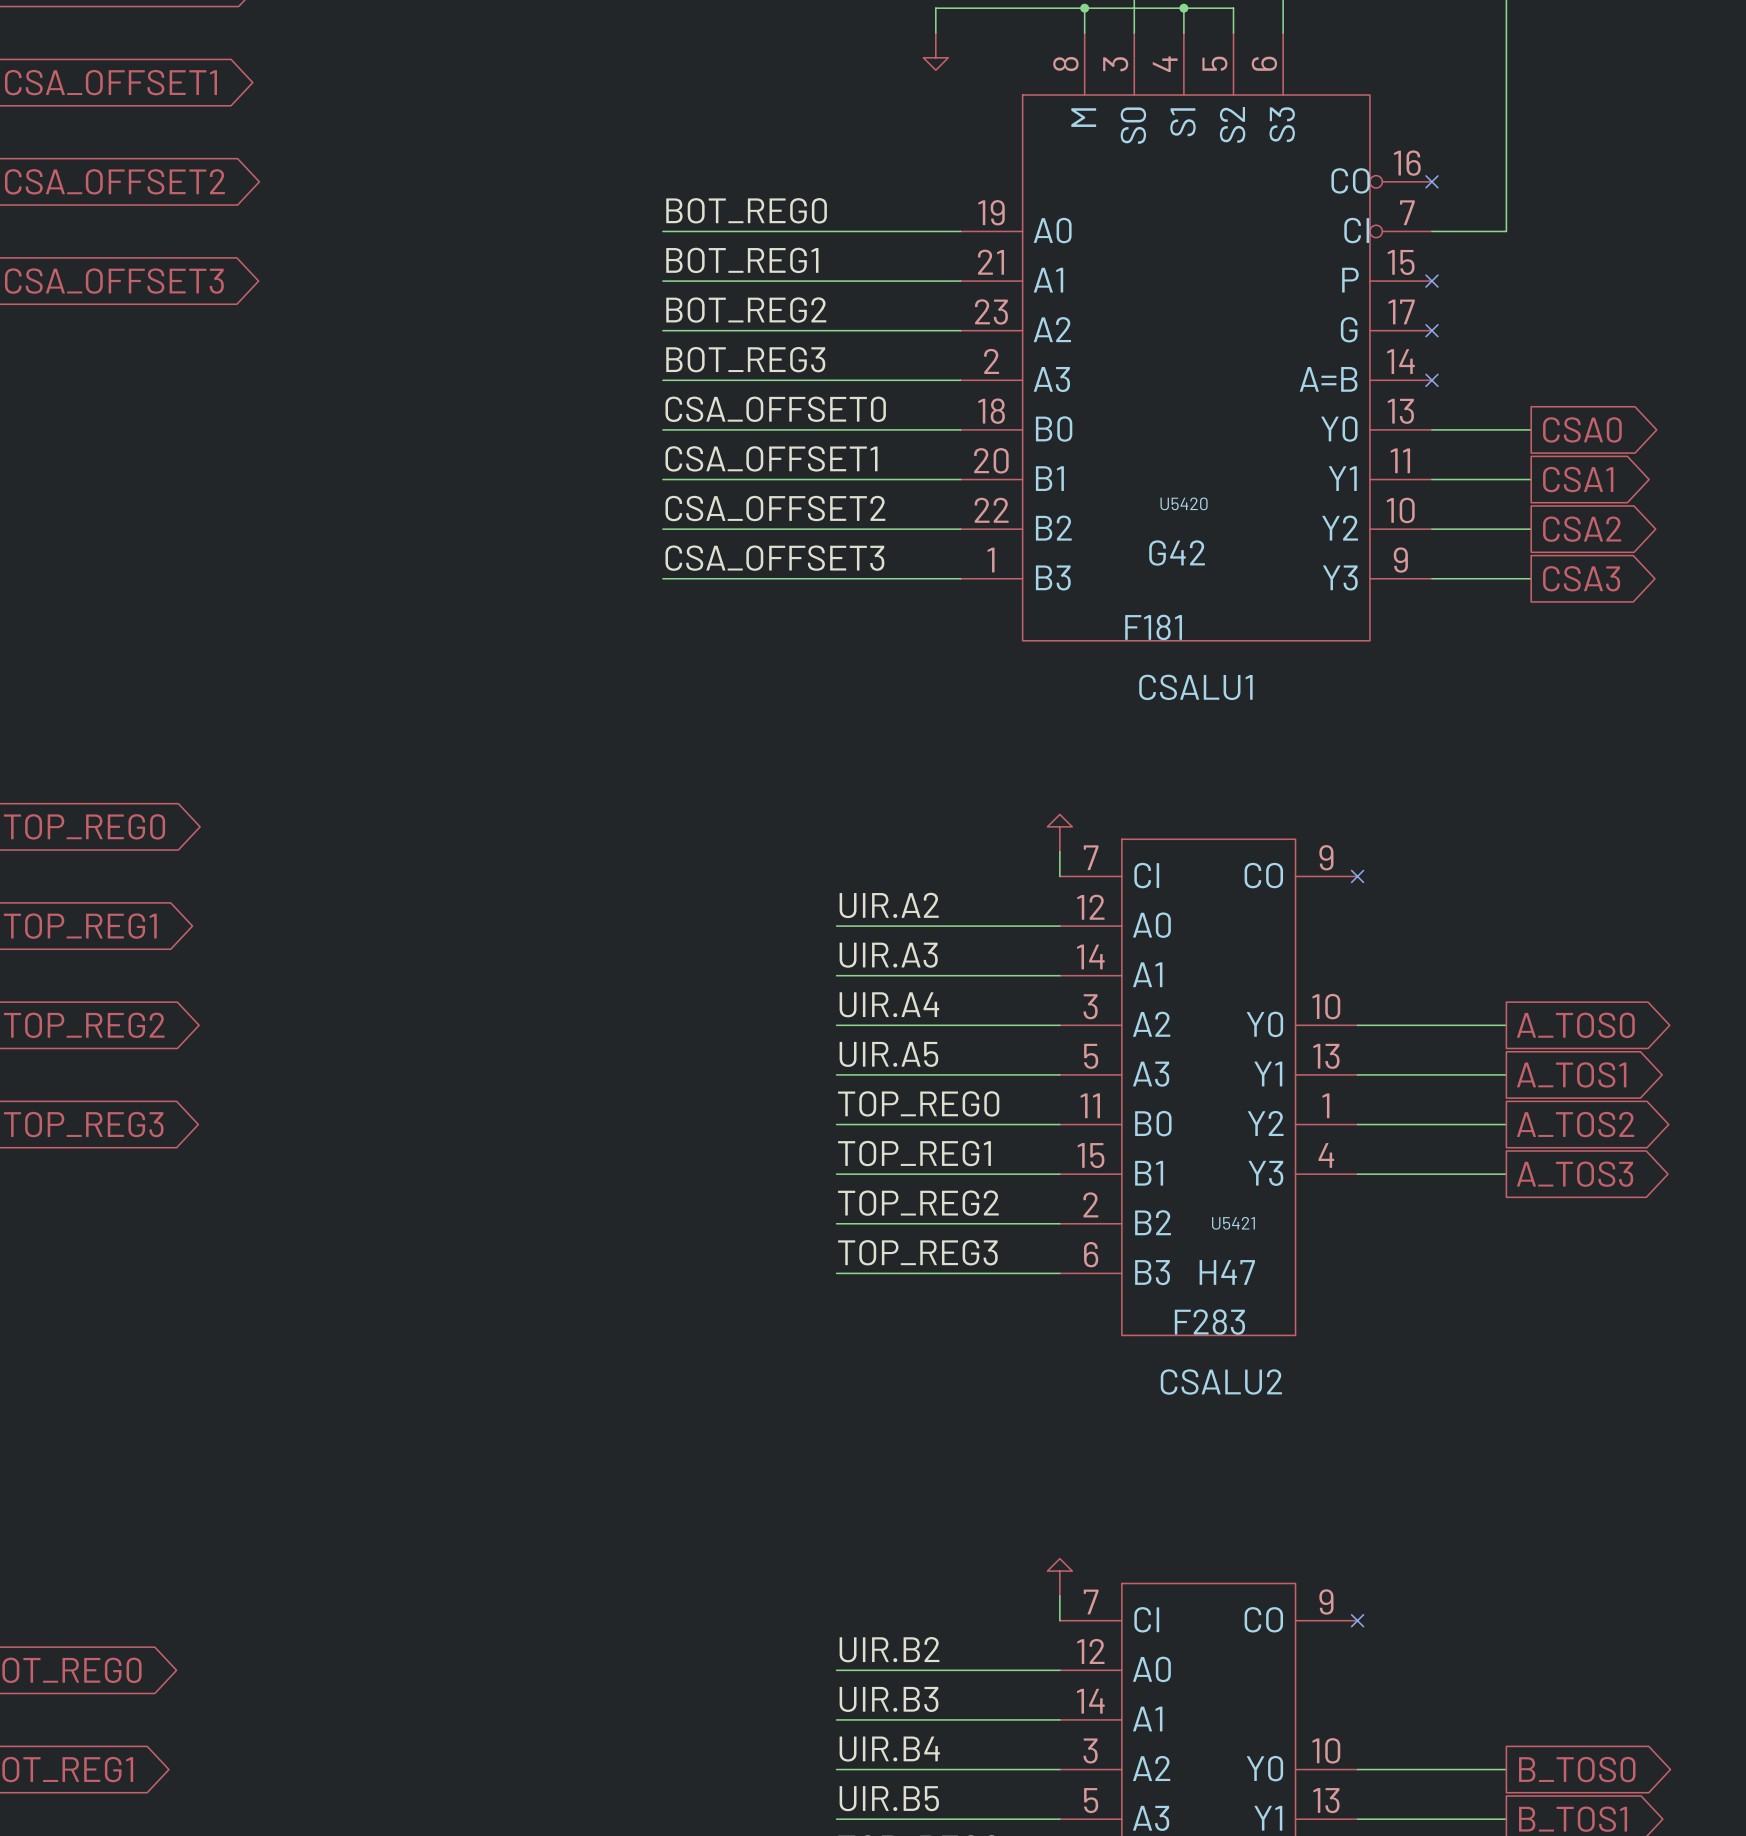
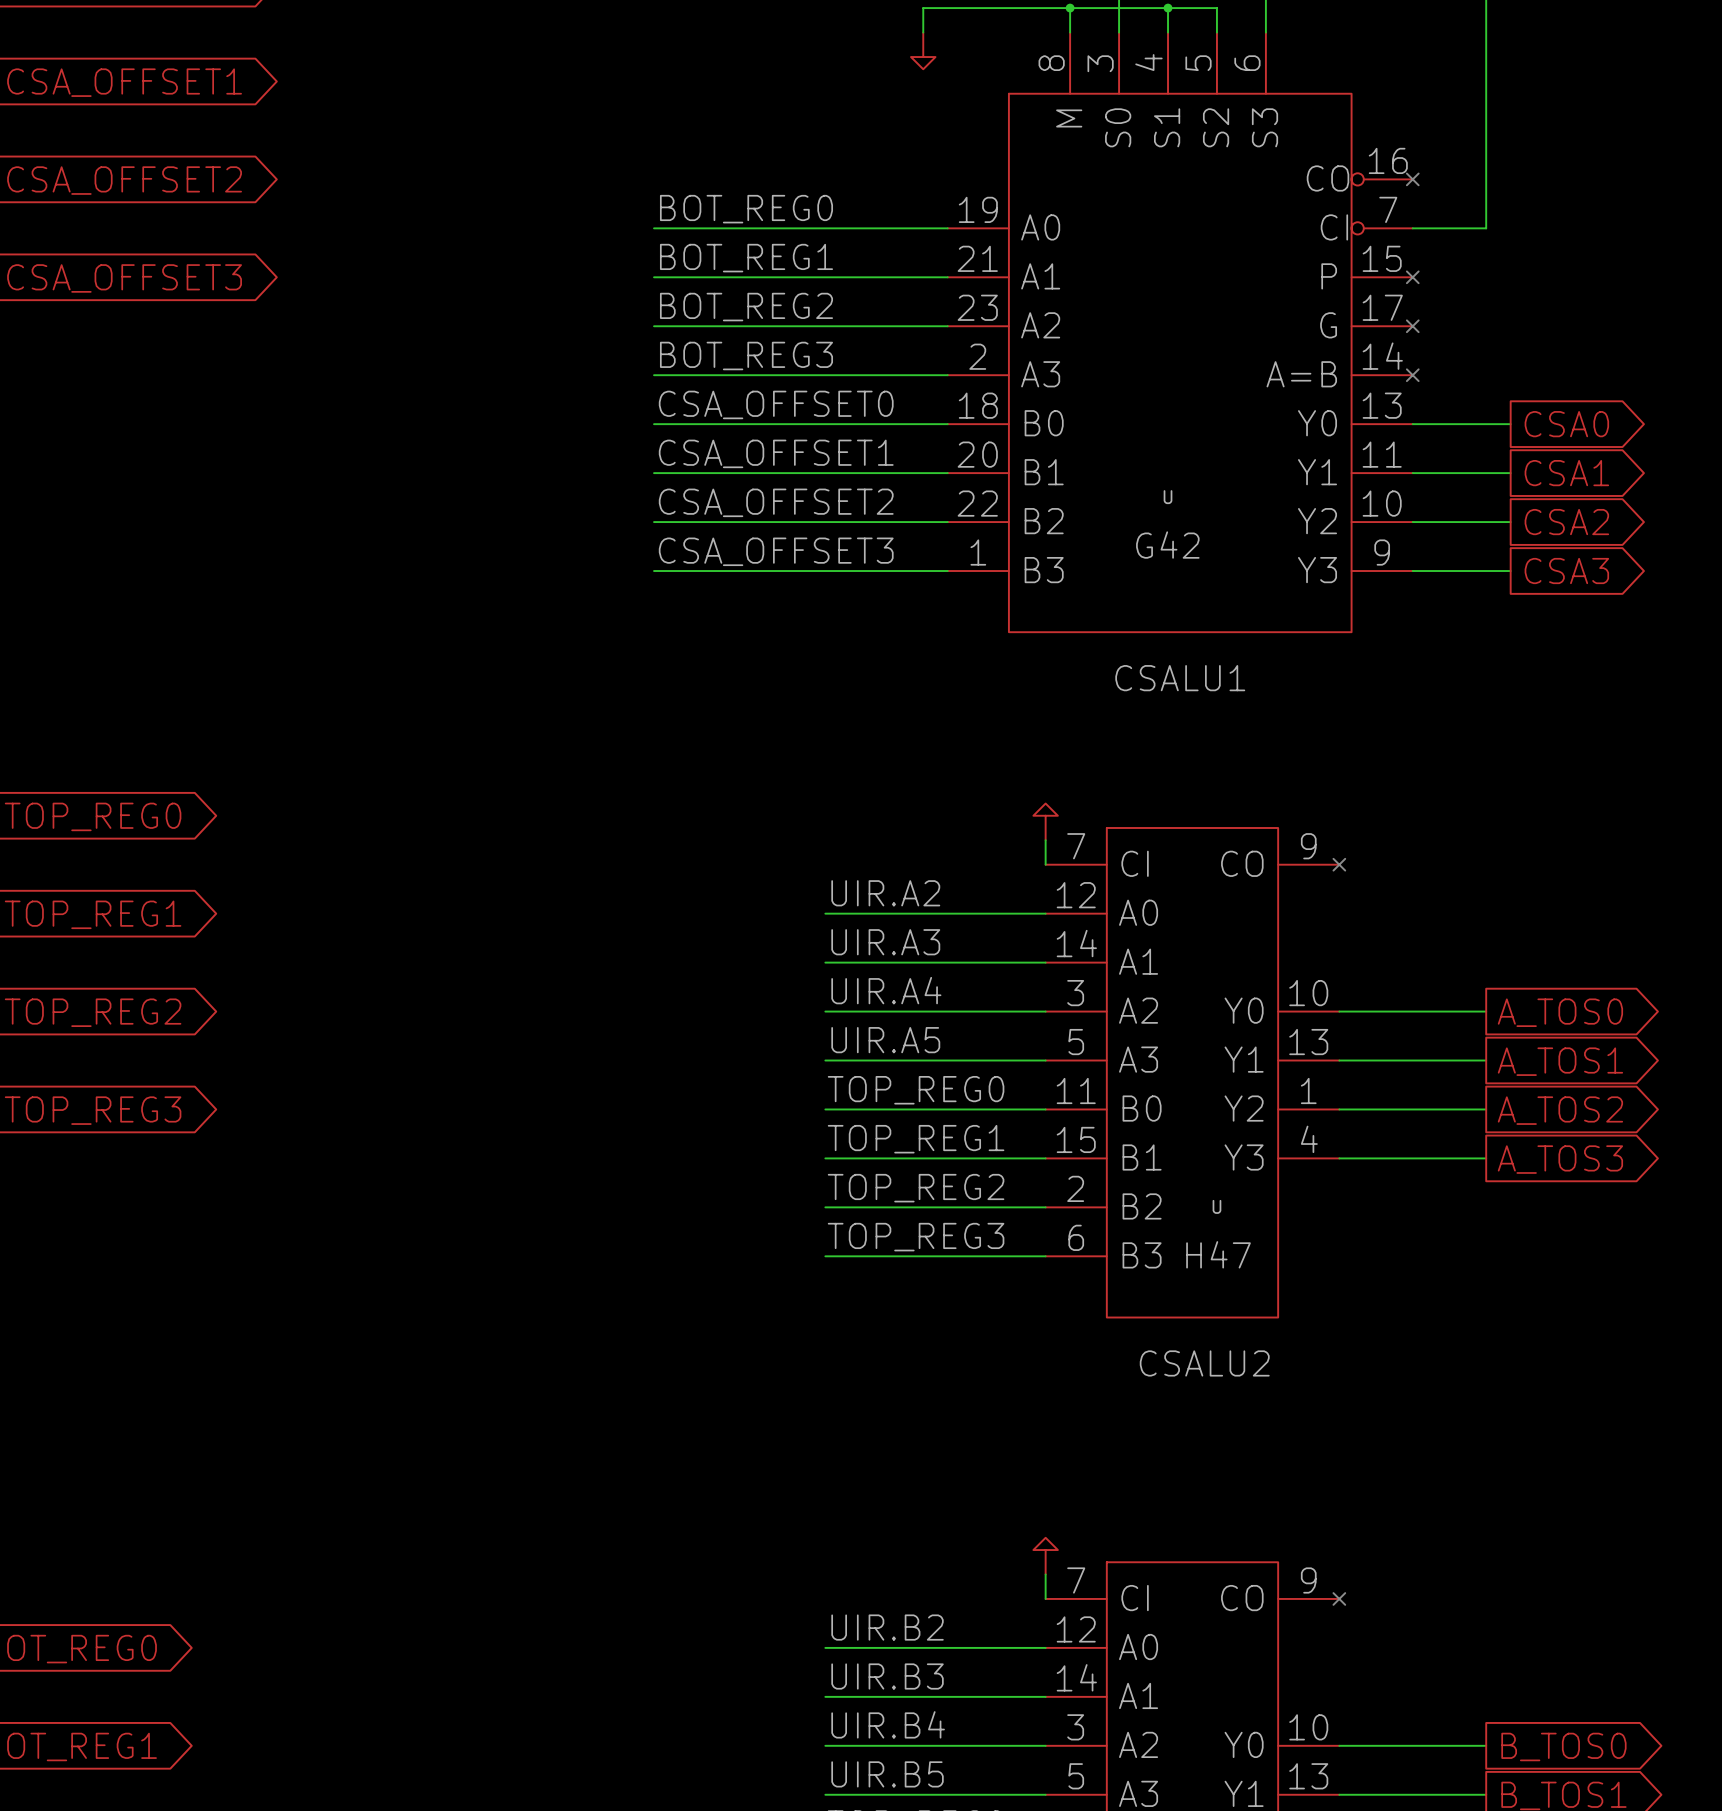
U5420 name: U5420 (1184, 503) -> U (1168, 497)
U5420 value: F181 (1153, 627) -> none
U5421 name: U5421 (1233, 1223) -> U (1216, 1206)
U5421 value: F283 (1209, 1322) -> none

